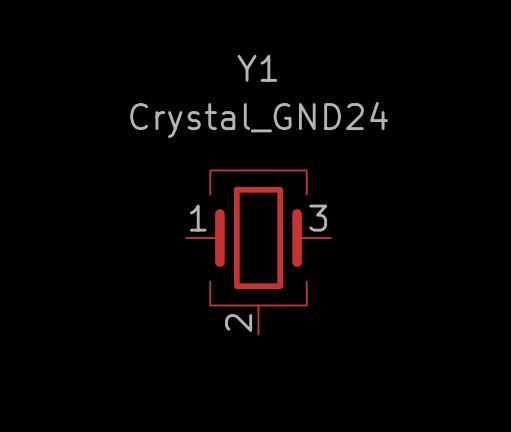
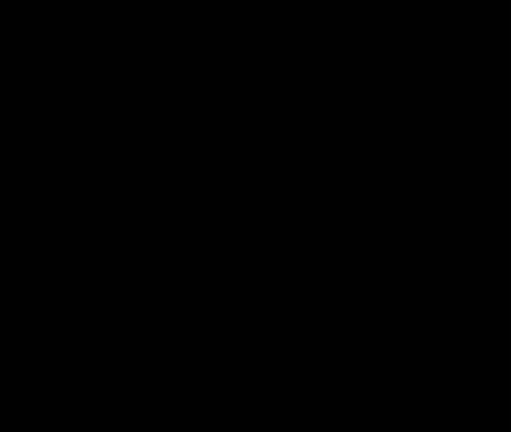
Y1: Crystal_GND24 (258, 252) -> none

